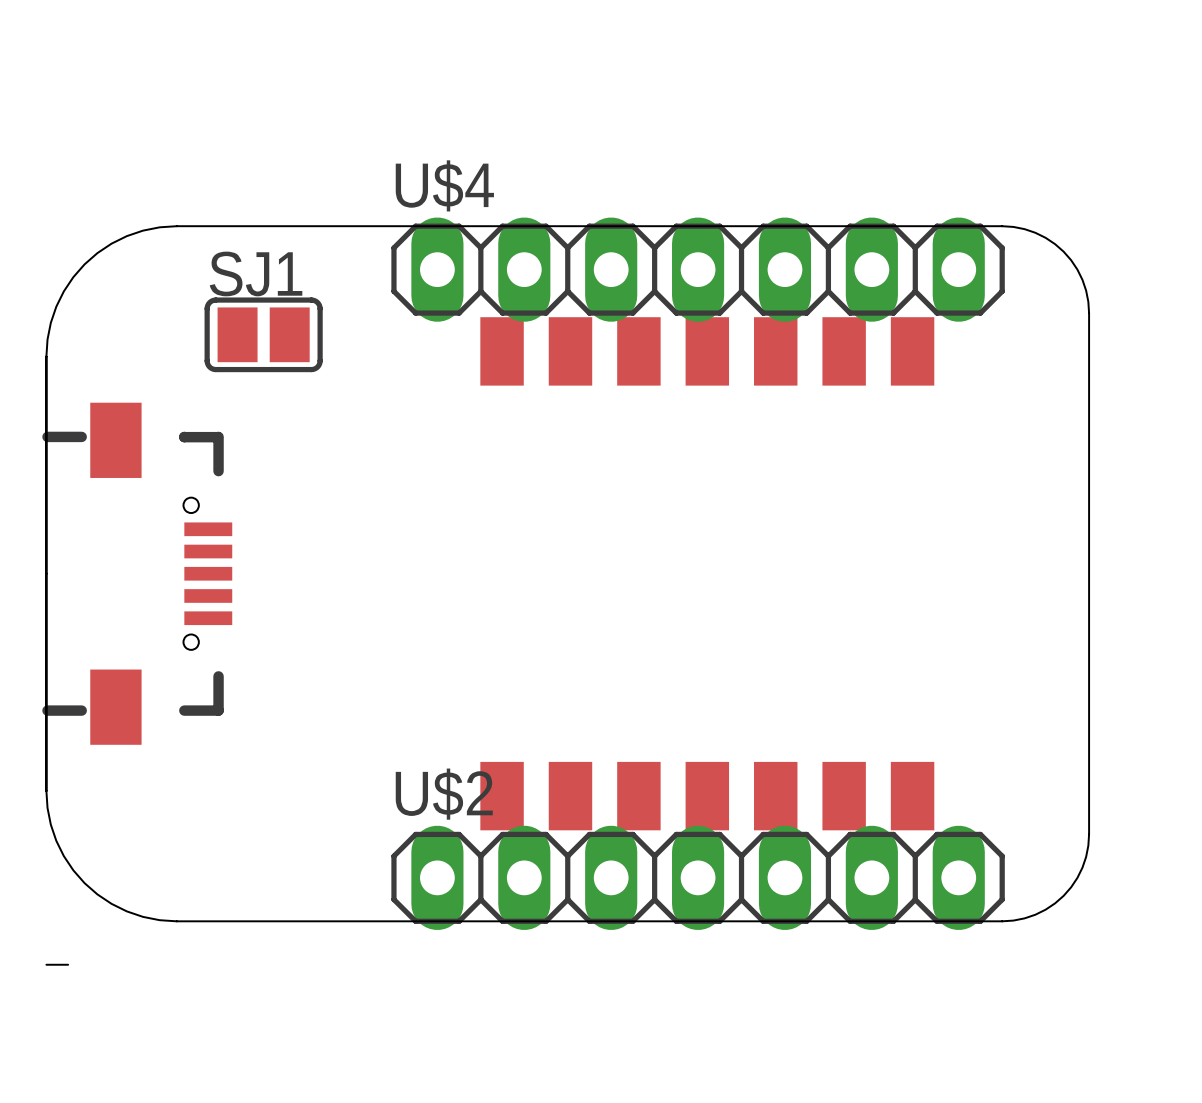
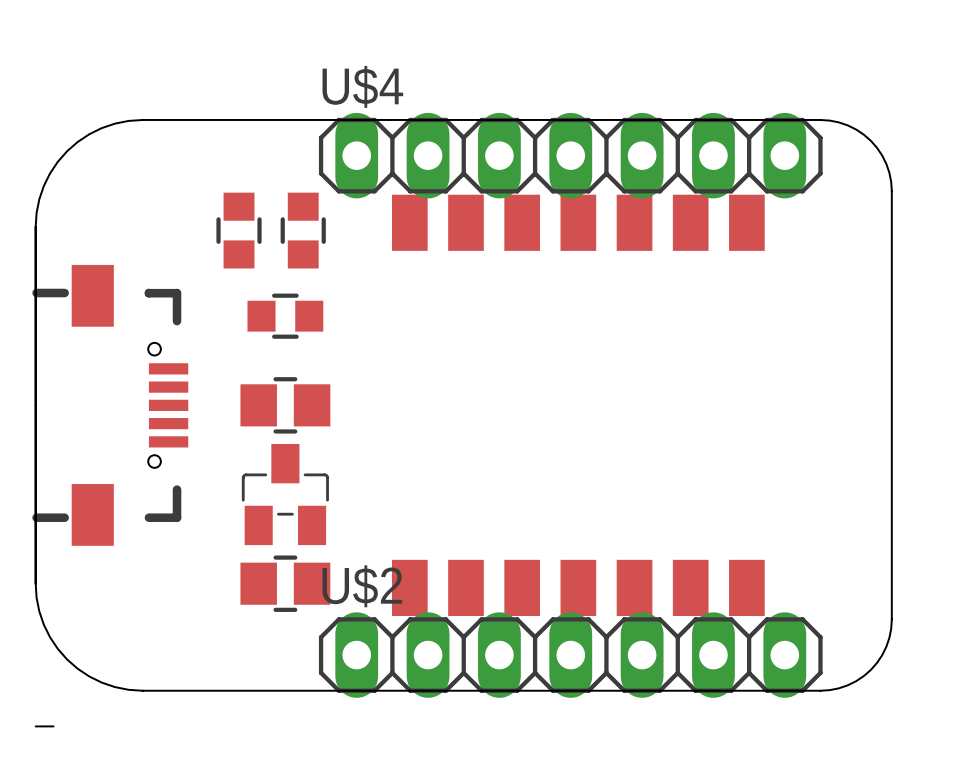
SJ1: (263, 334) -> none
part: none -> (239, 230)
part: none -> (303, 230)
part: none -> (285, 316)
part: none -> (285, 405)
part: none -> (285, 494)
part: none -> (285, 583)

